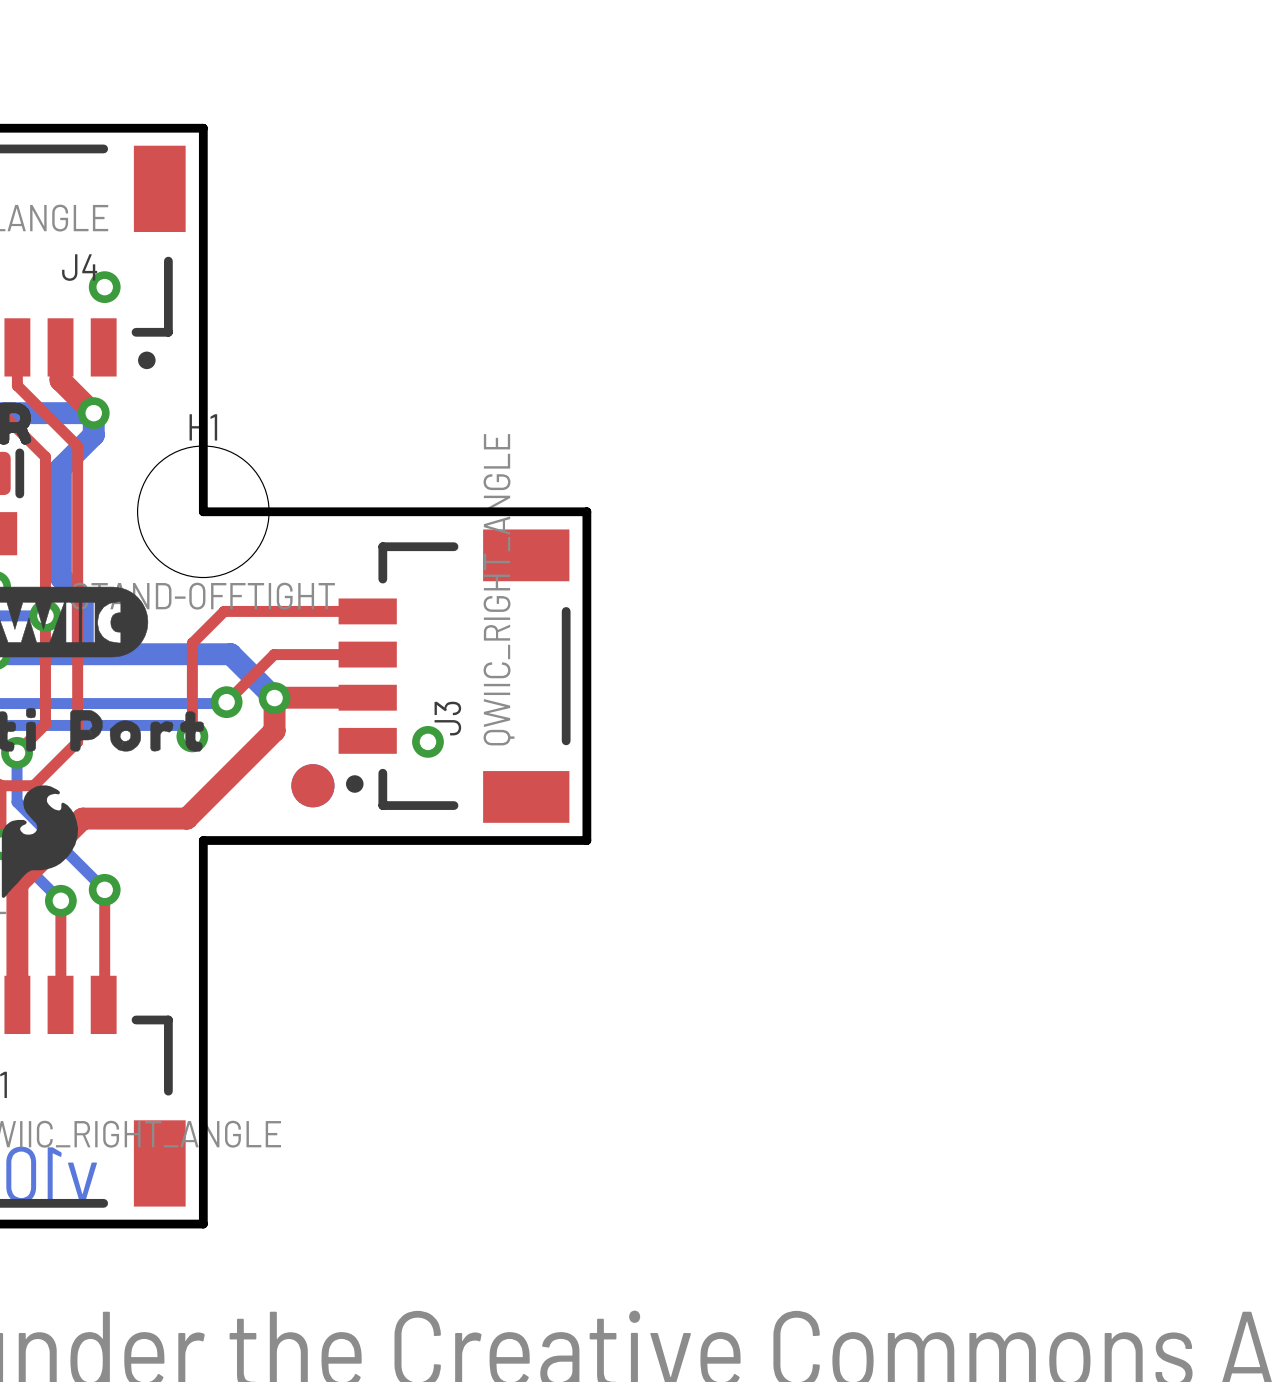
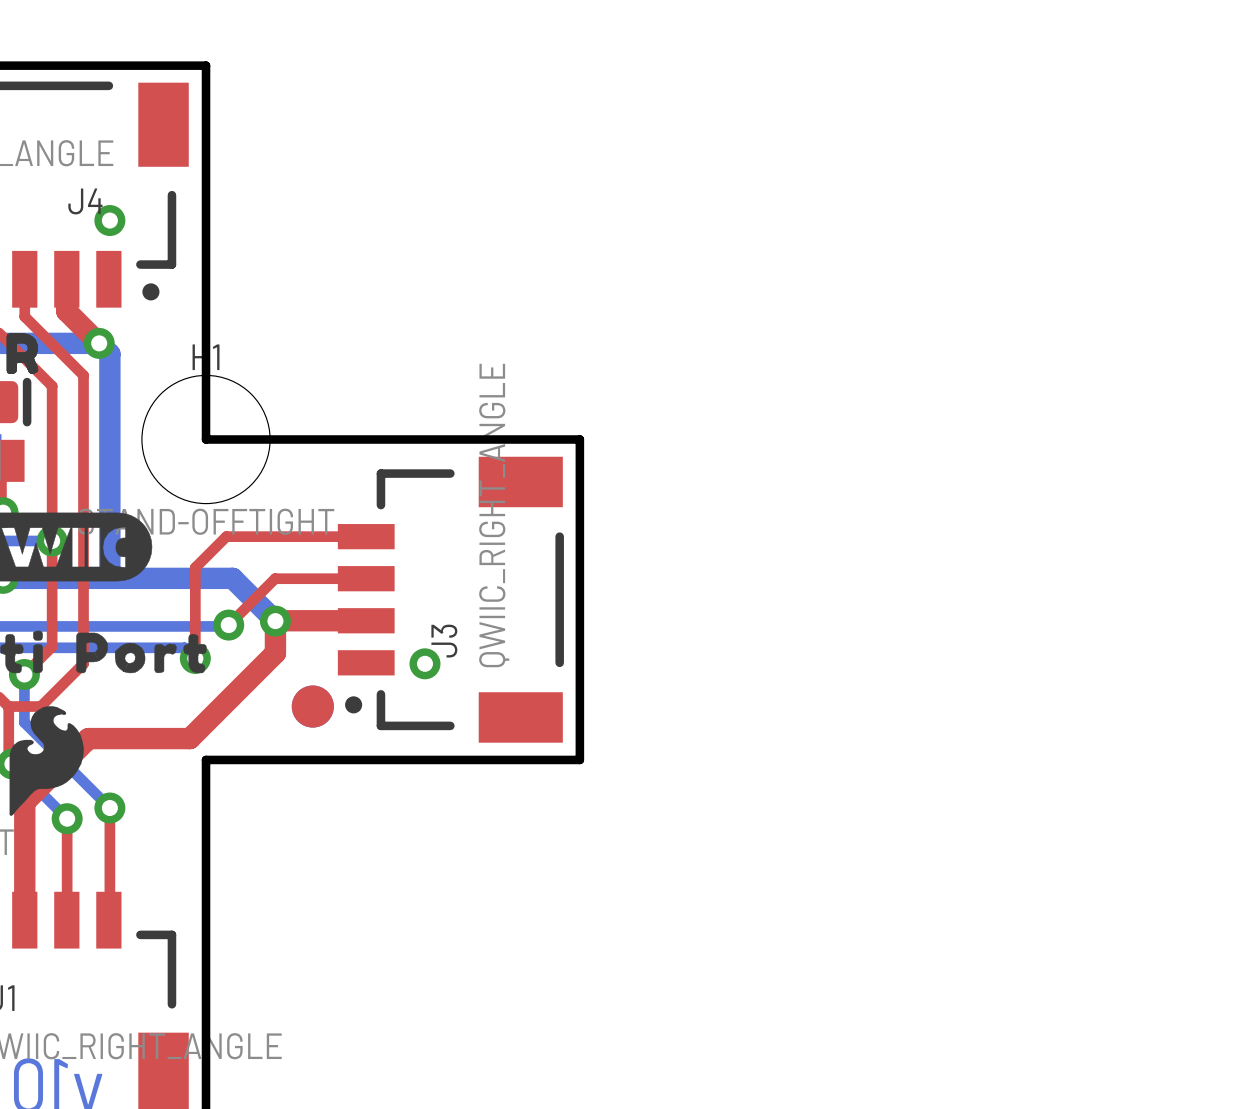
bottom track: (93, 413) (93, 435) (60, 467) (60, 577) (82, 599) (82, 654) -> (99, 343) (109, 354) (109, 578)

